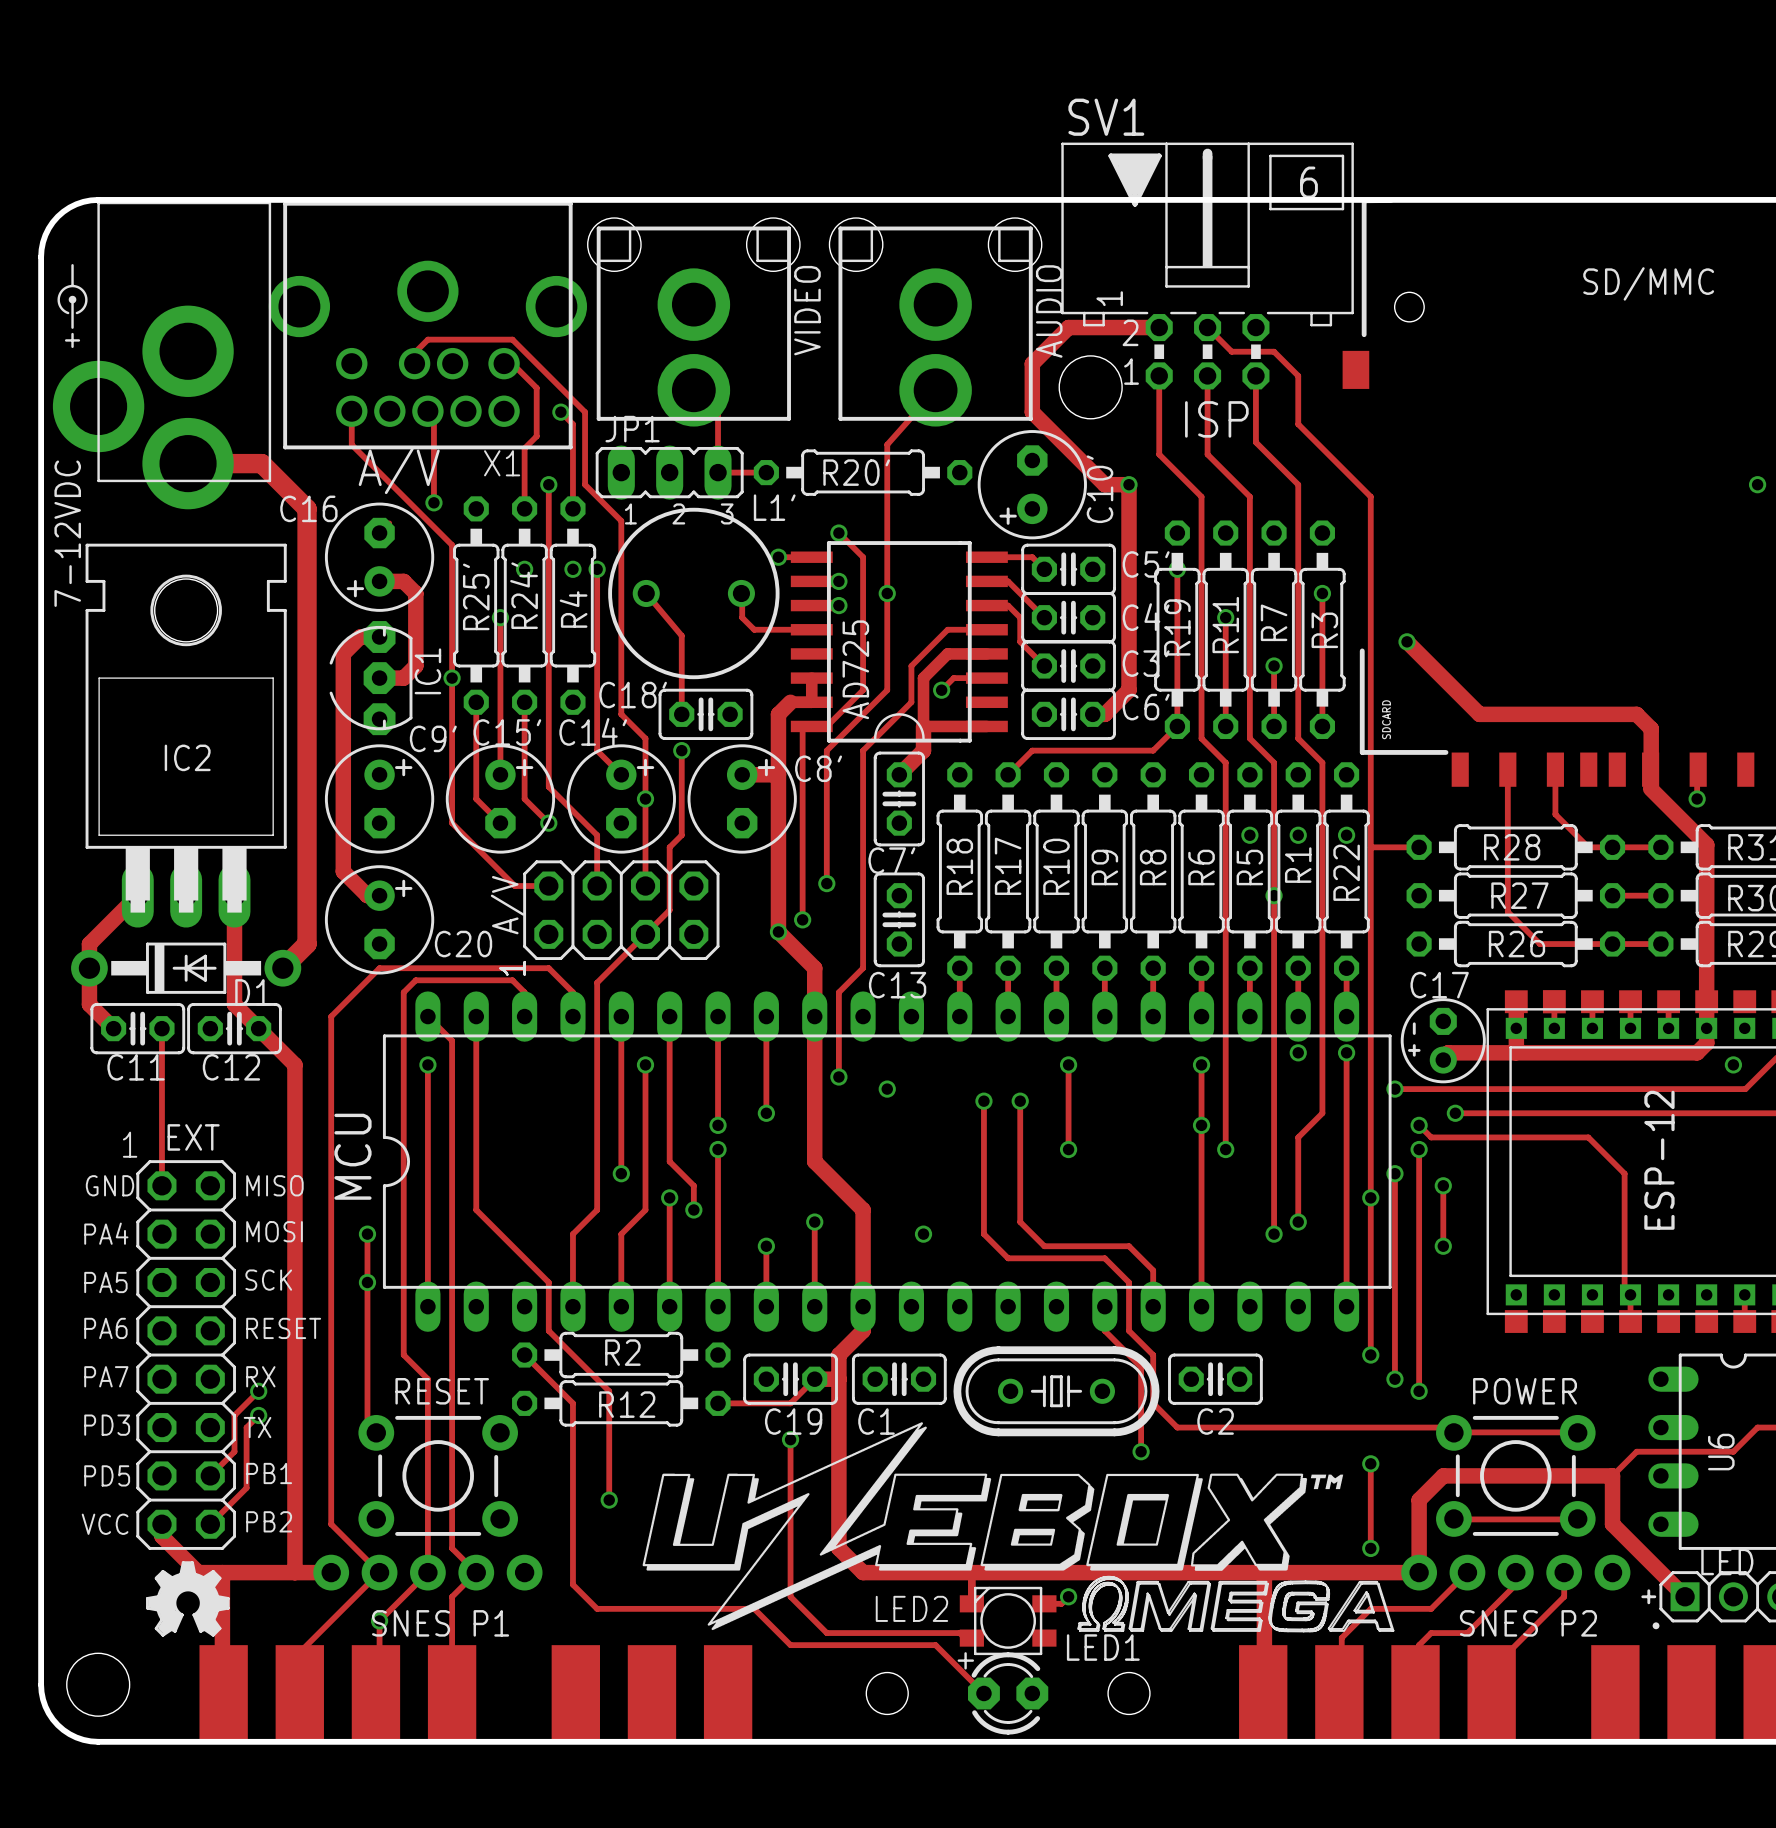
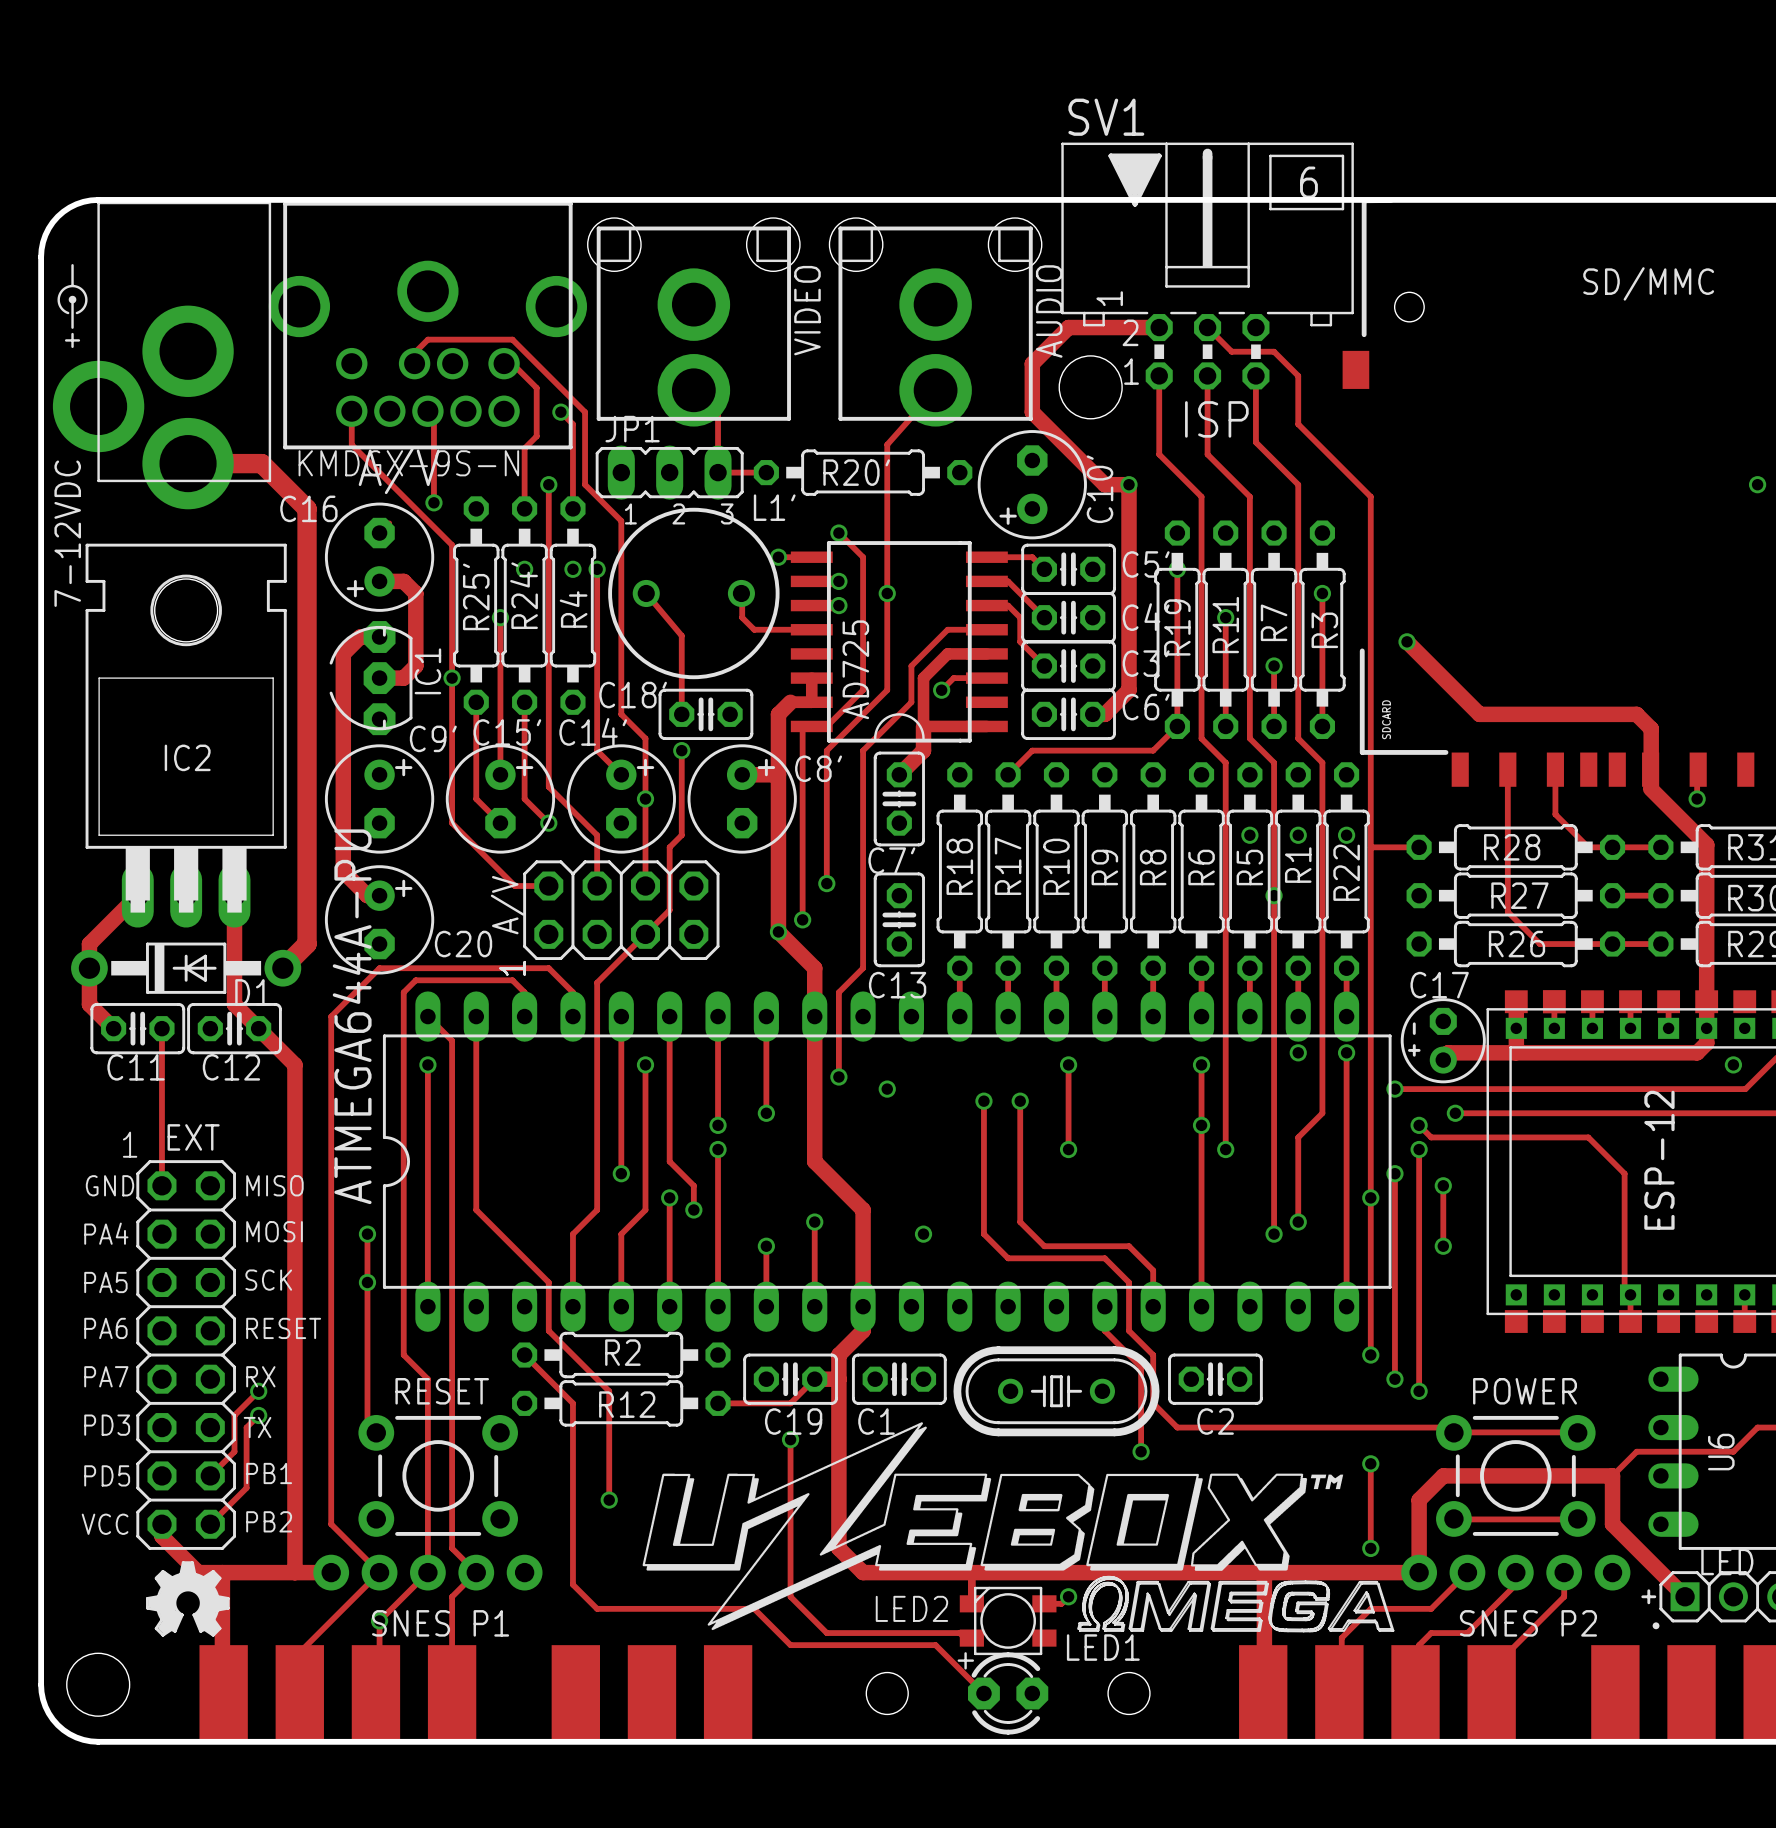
X1 name: X1 (502, 463) -> KMDGX-9S-N (408, 463)
MCU name: MCU (352, 1156) -> ATMEGA644A-PU (352, 1016)

